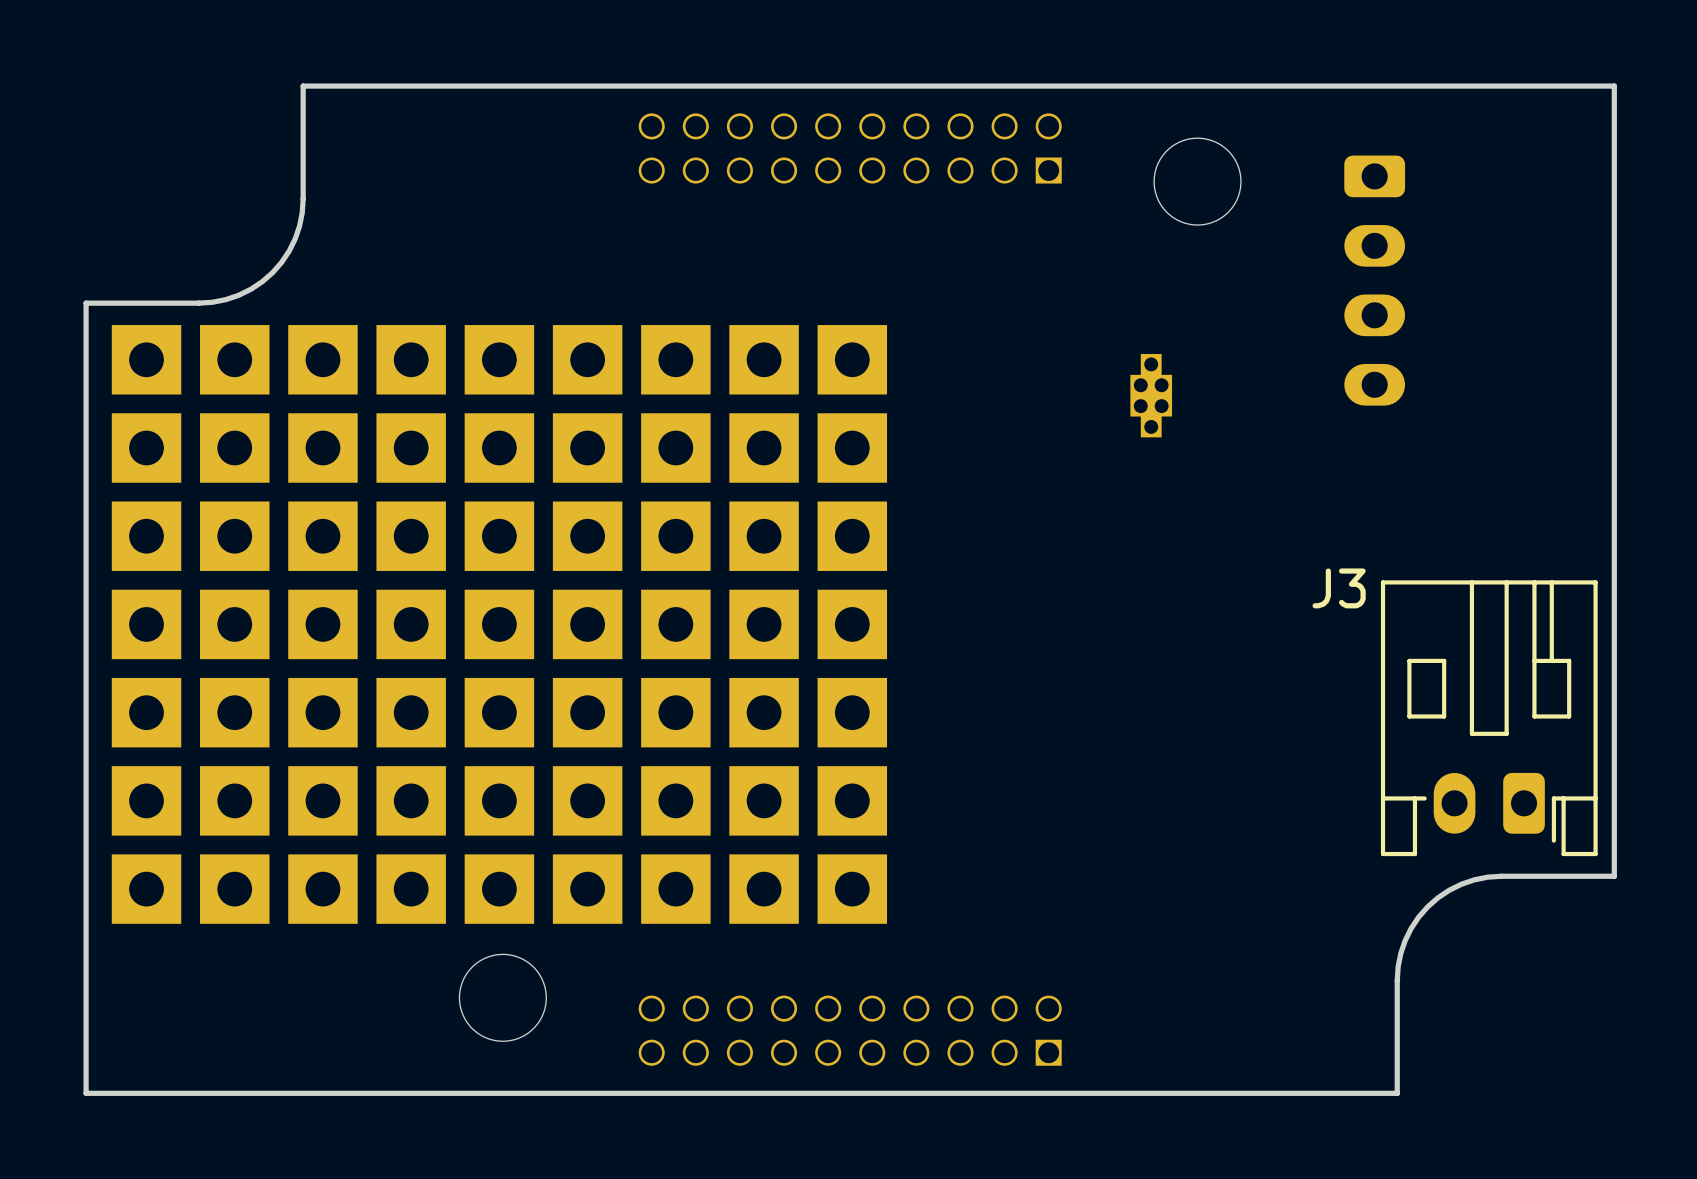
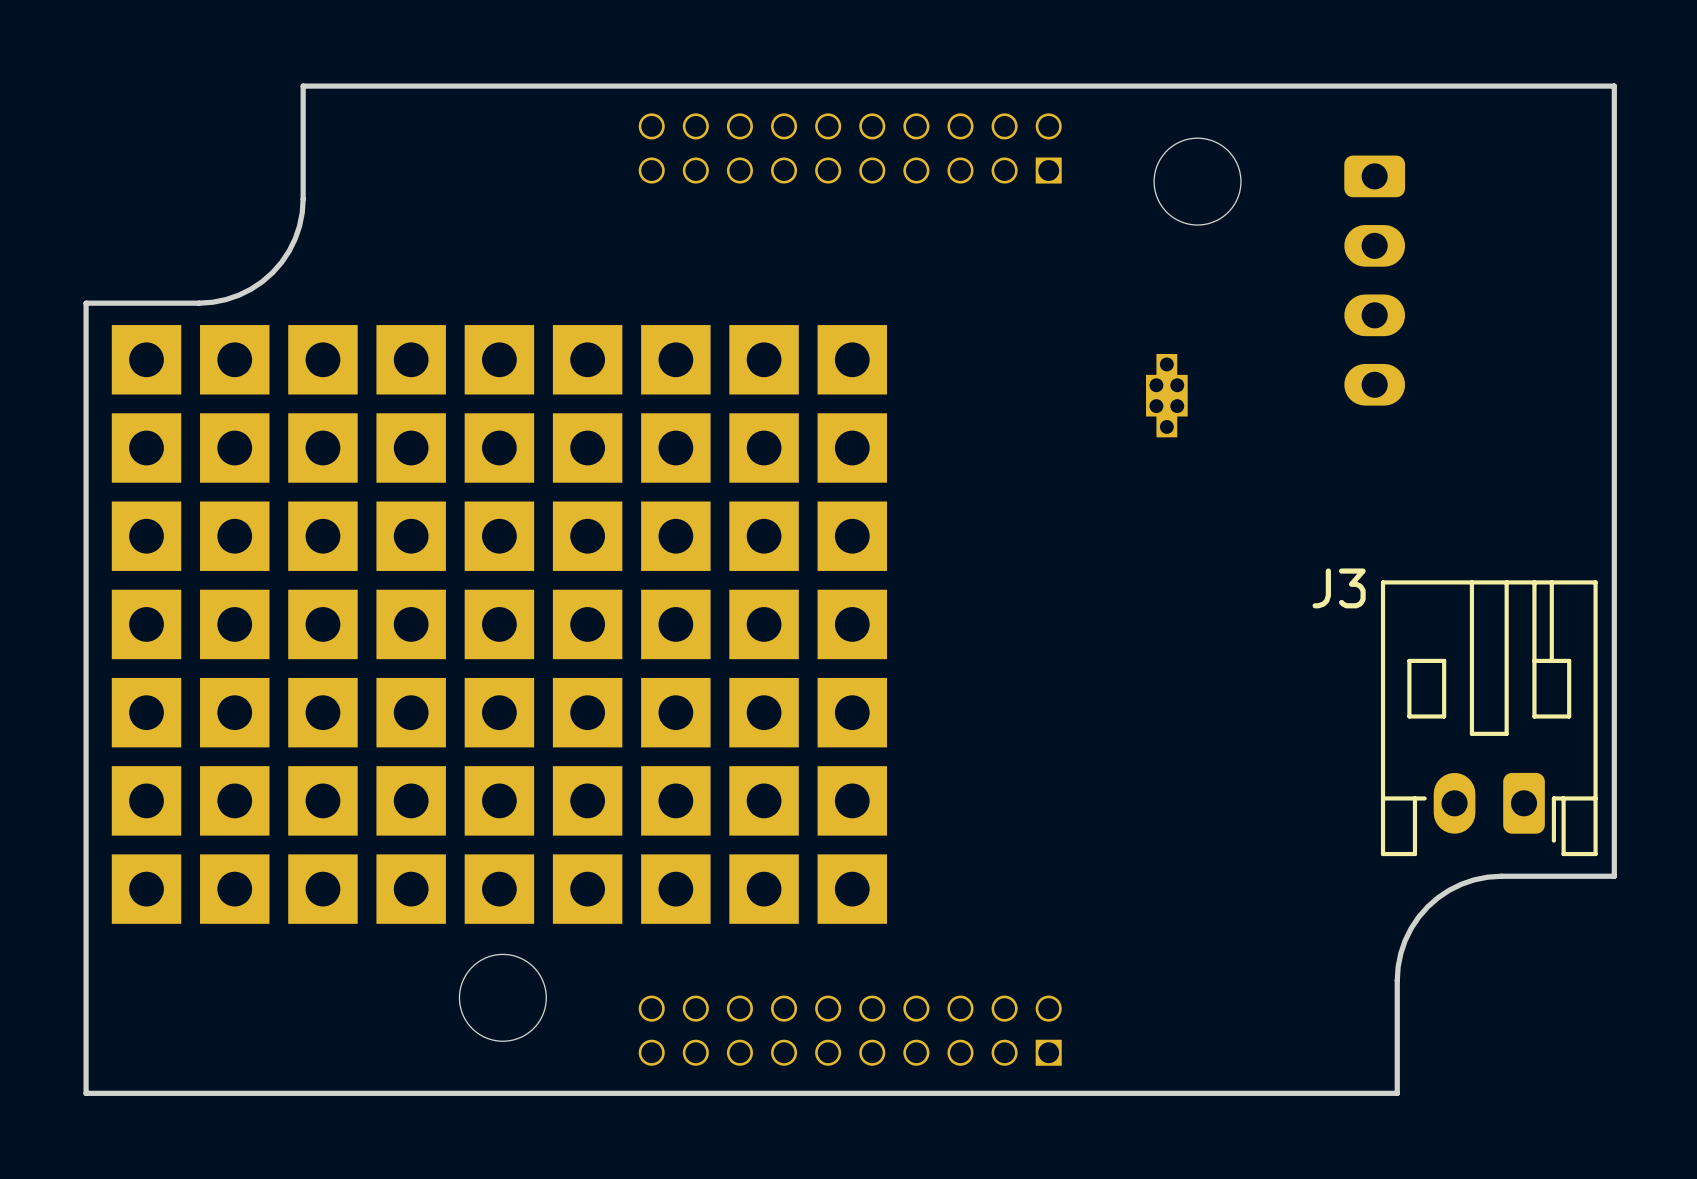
part position: (1151, 395) -> (1166, 395)

